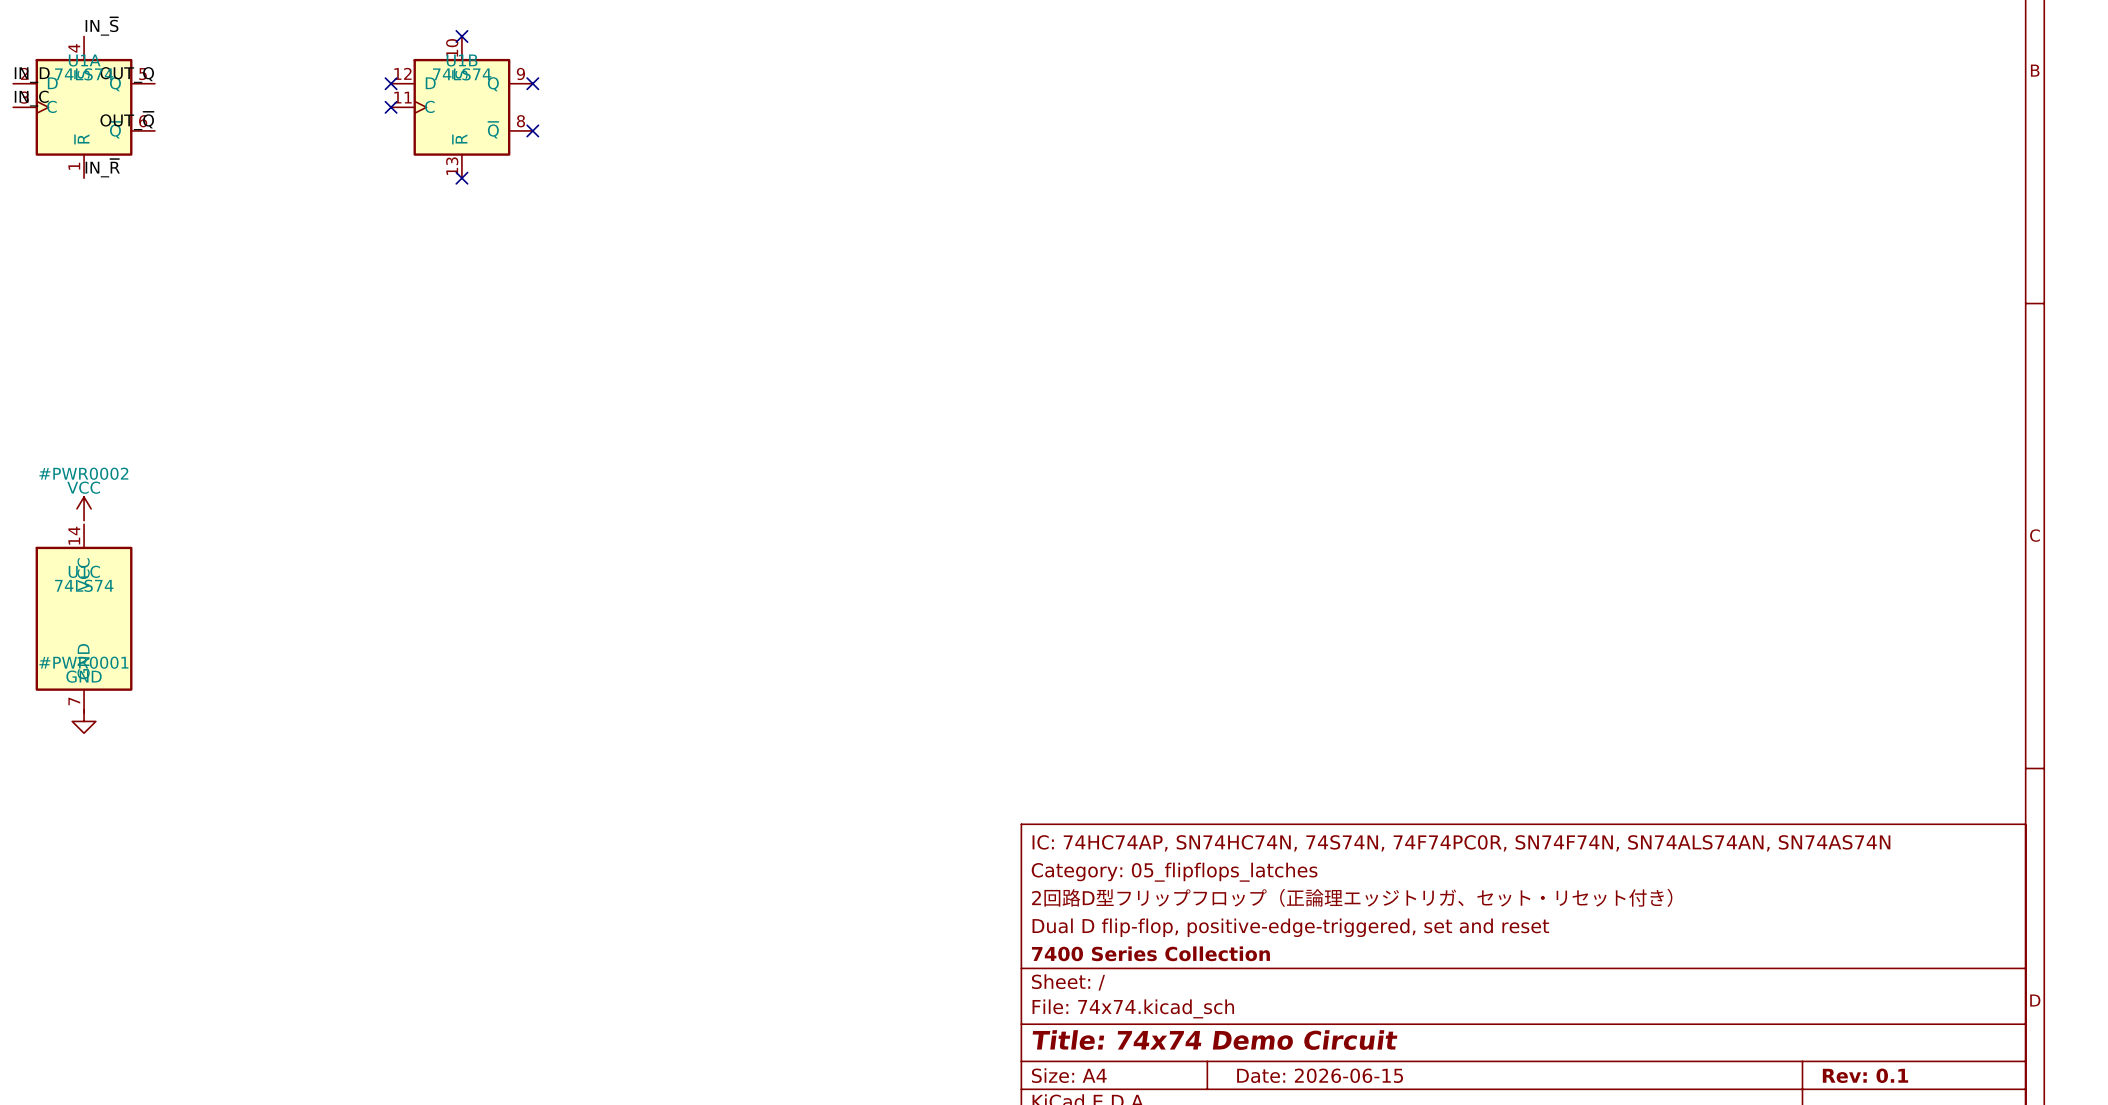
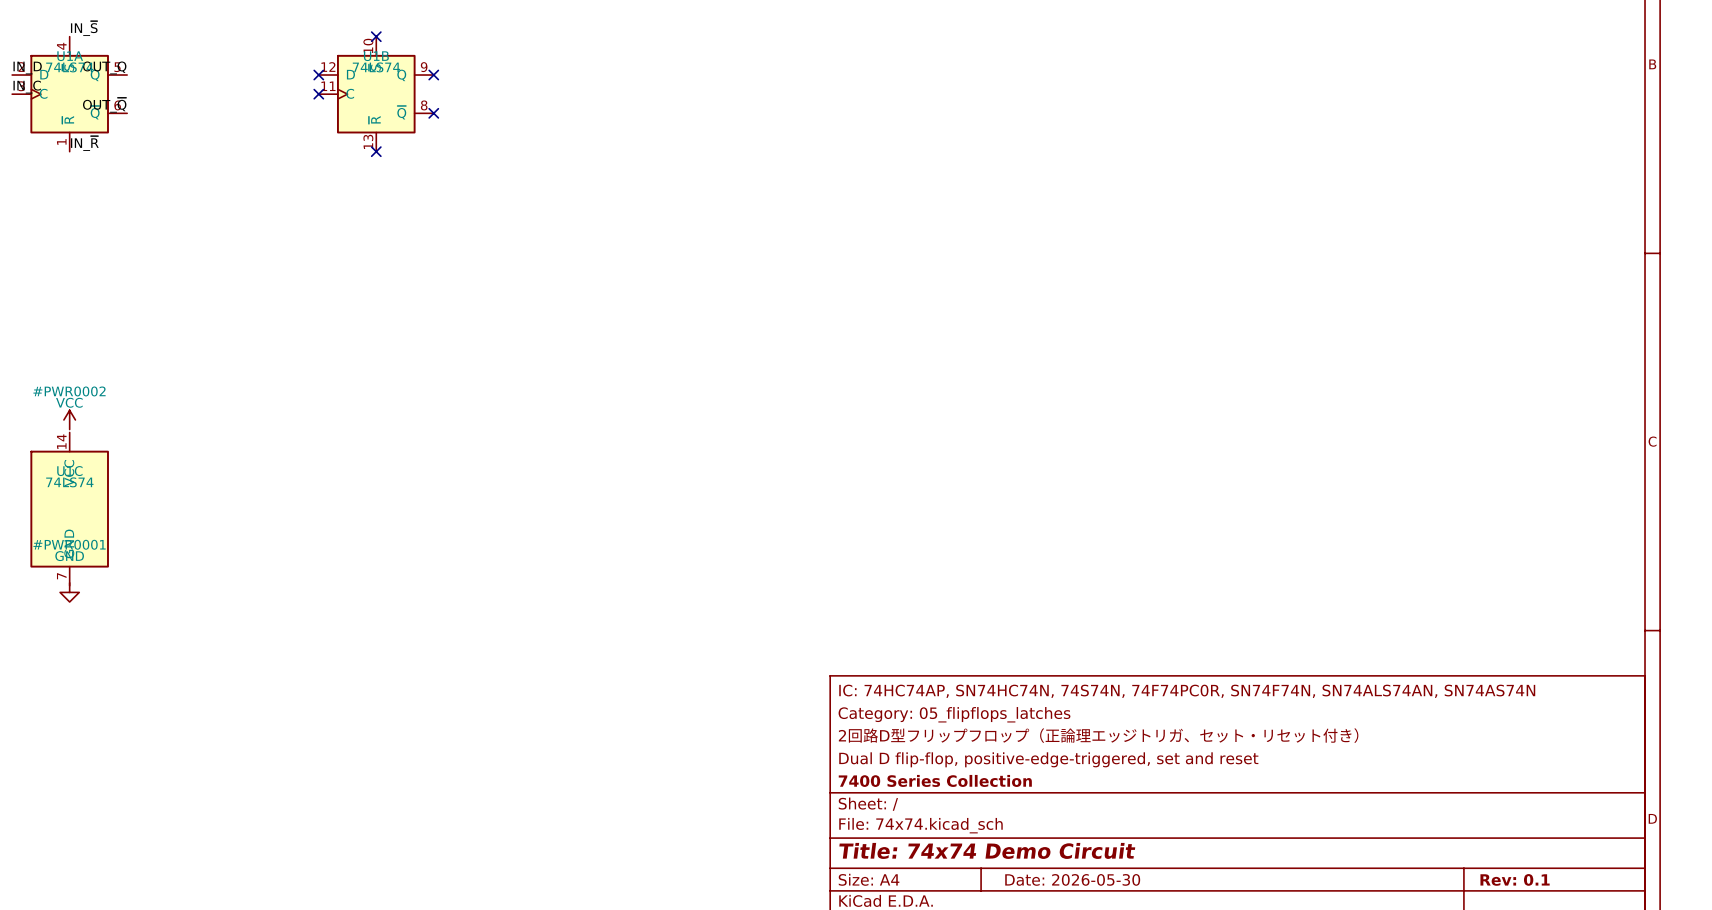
title block: Date: 2026-06-15 (1320, 1075) -> Date: 2026-05-30 (1072, 879)

